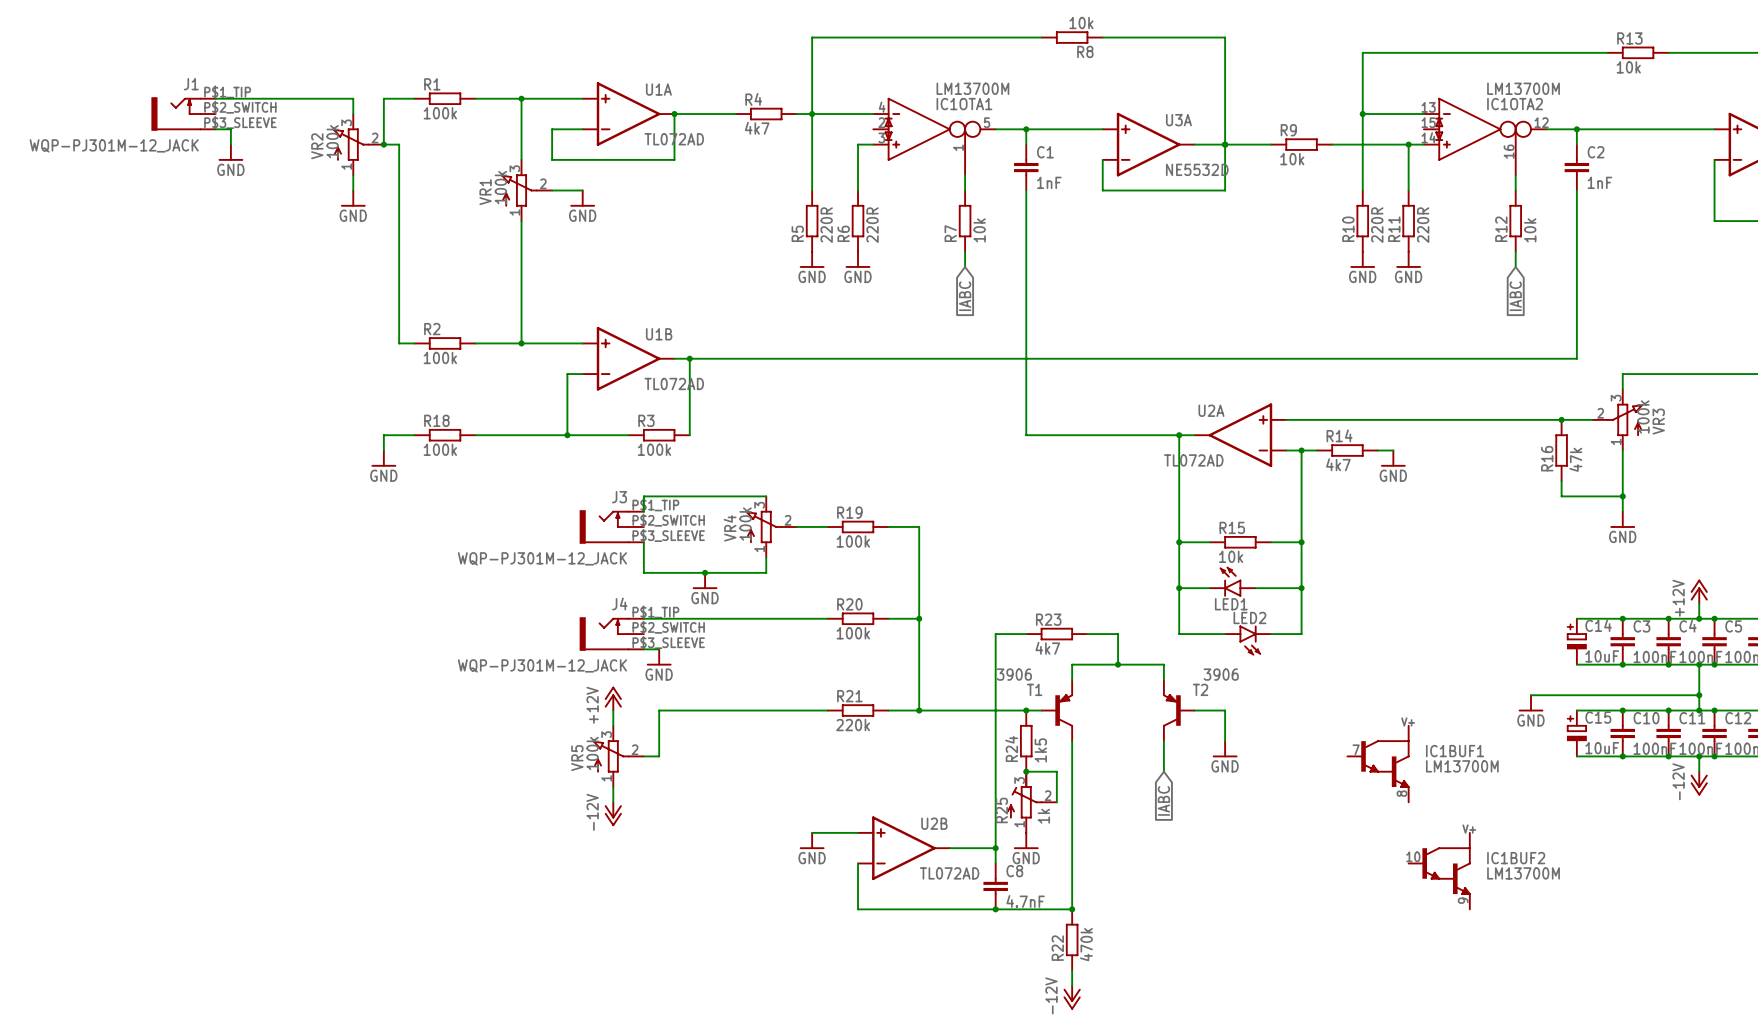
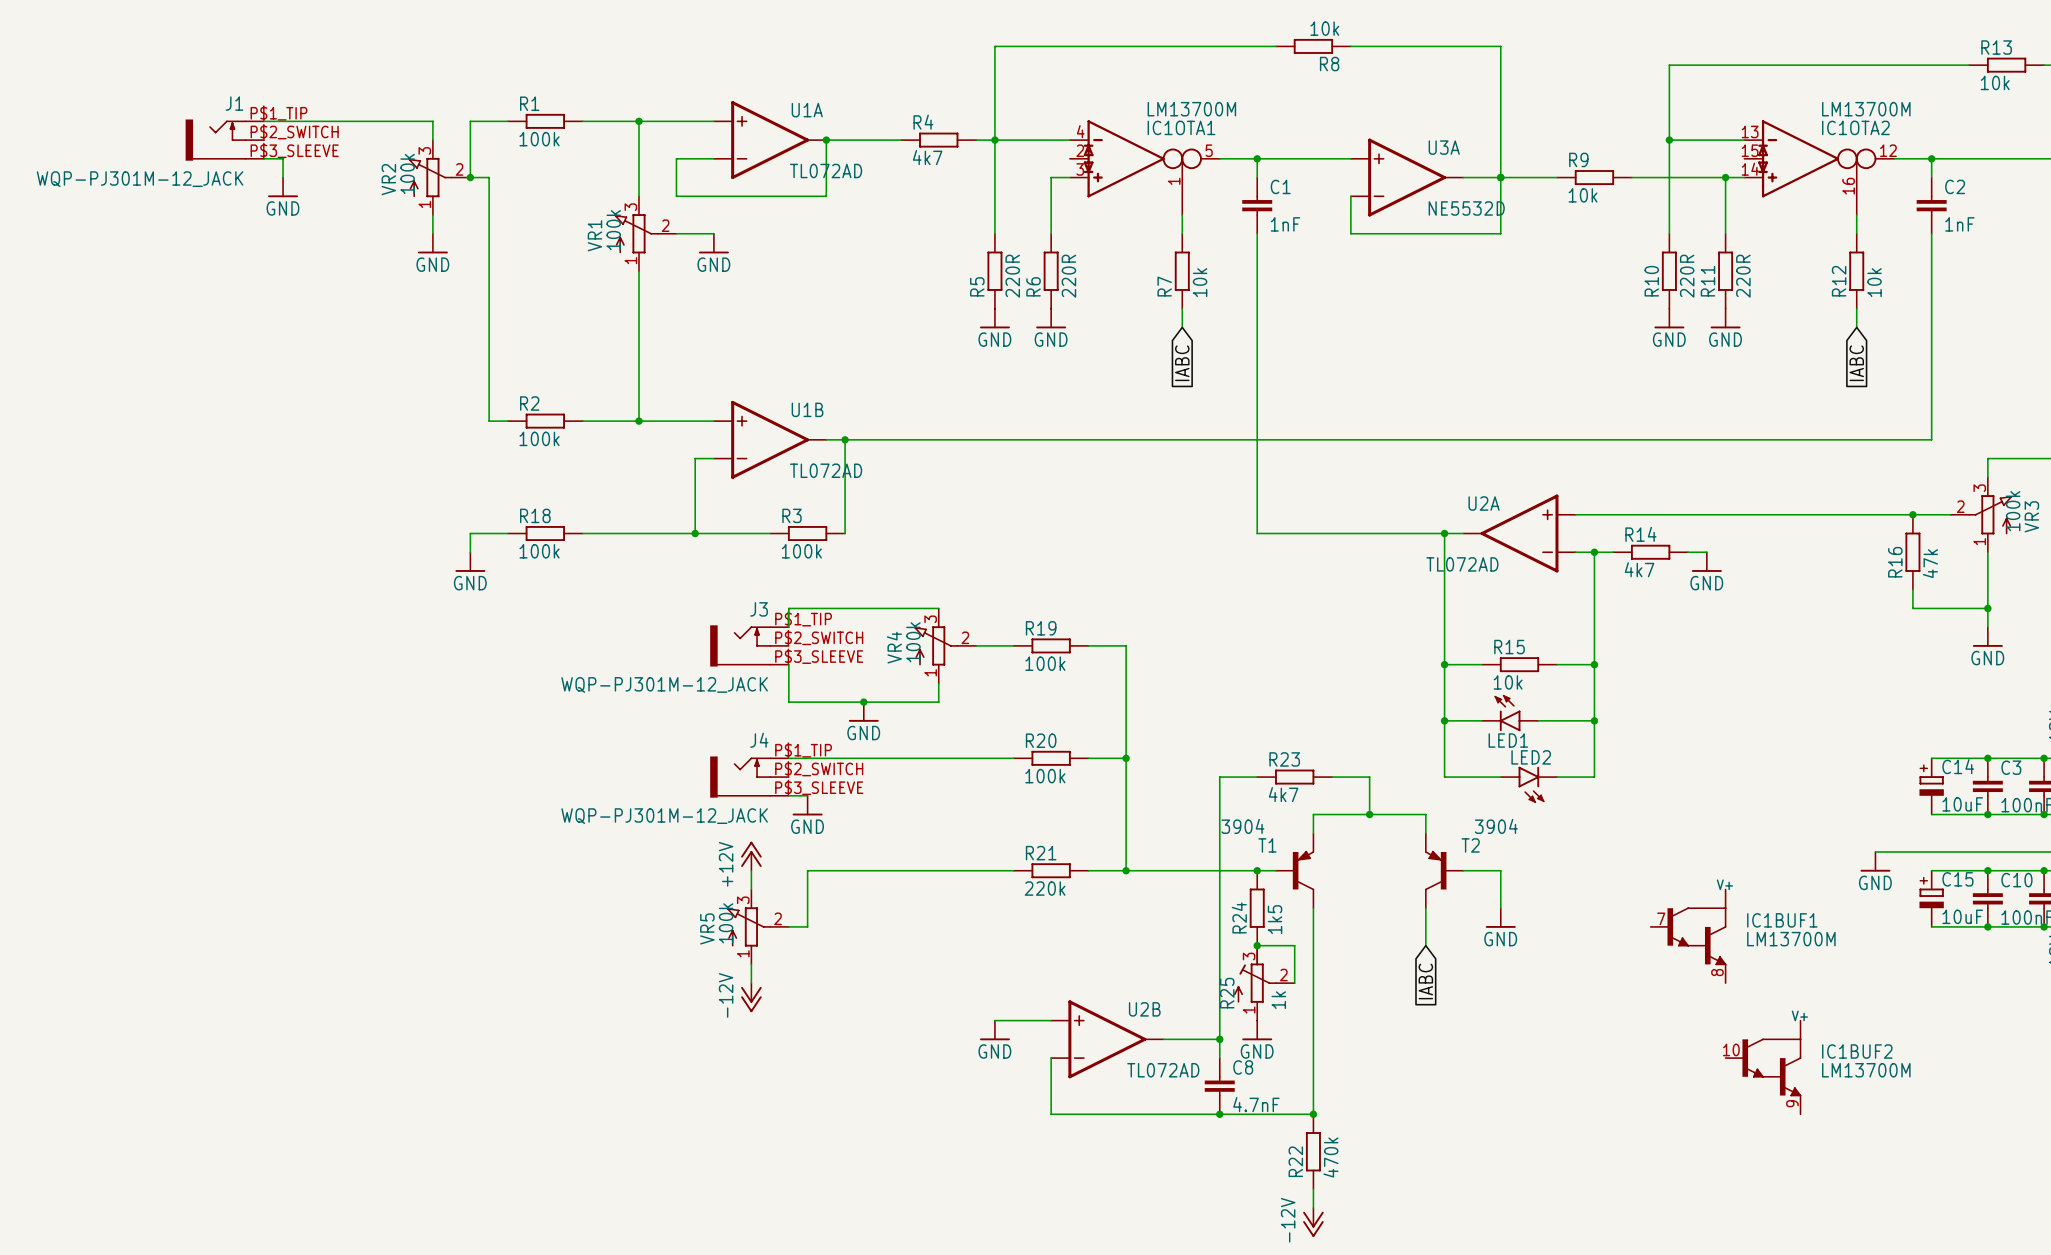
T1 value: 3906 (1014, 674) -> 3904 (1242, 826)
T2 value: 3906 (1221, 674) -> 3904 (1496, 826)

